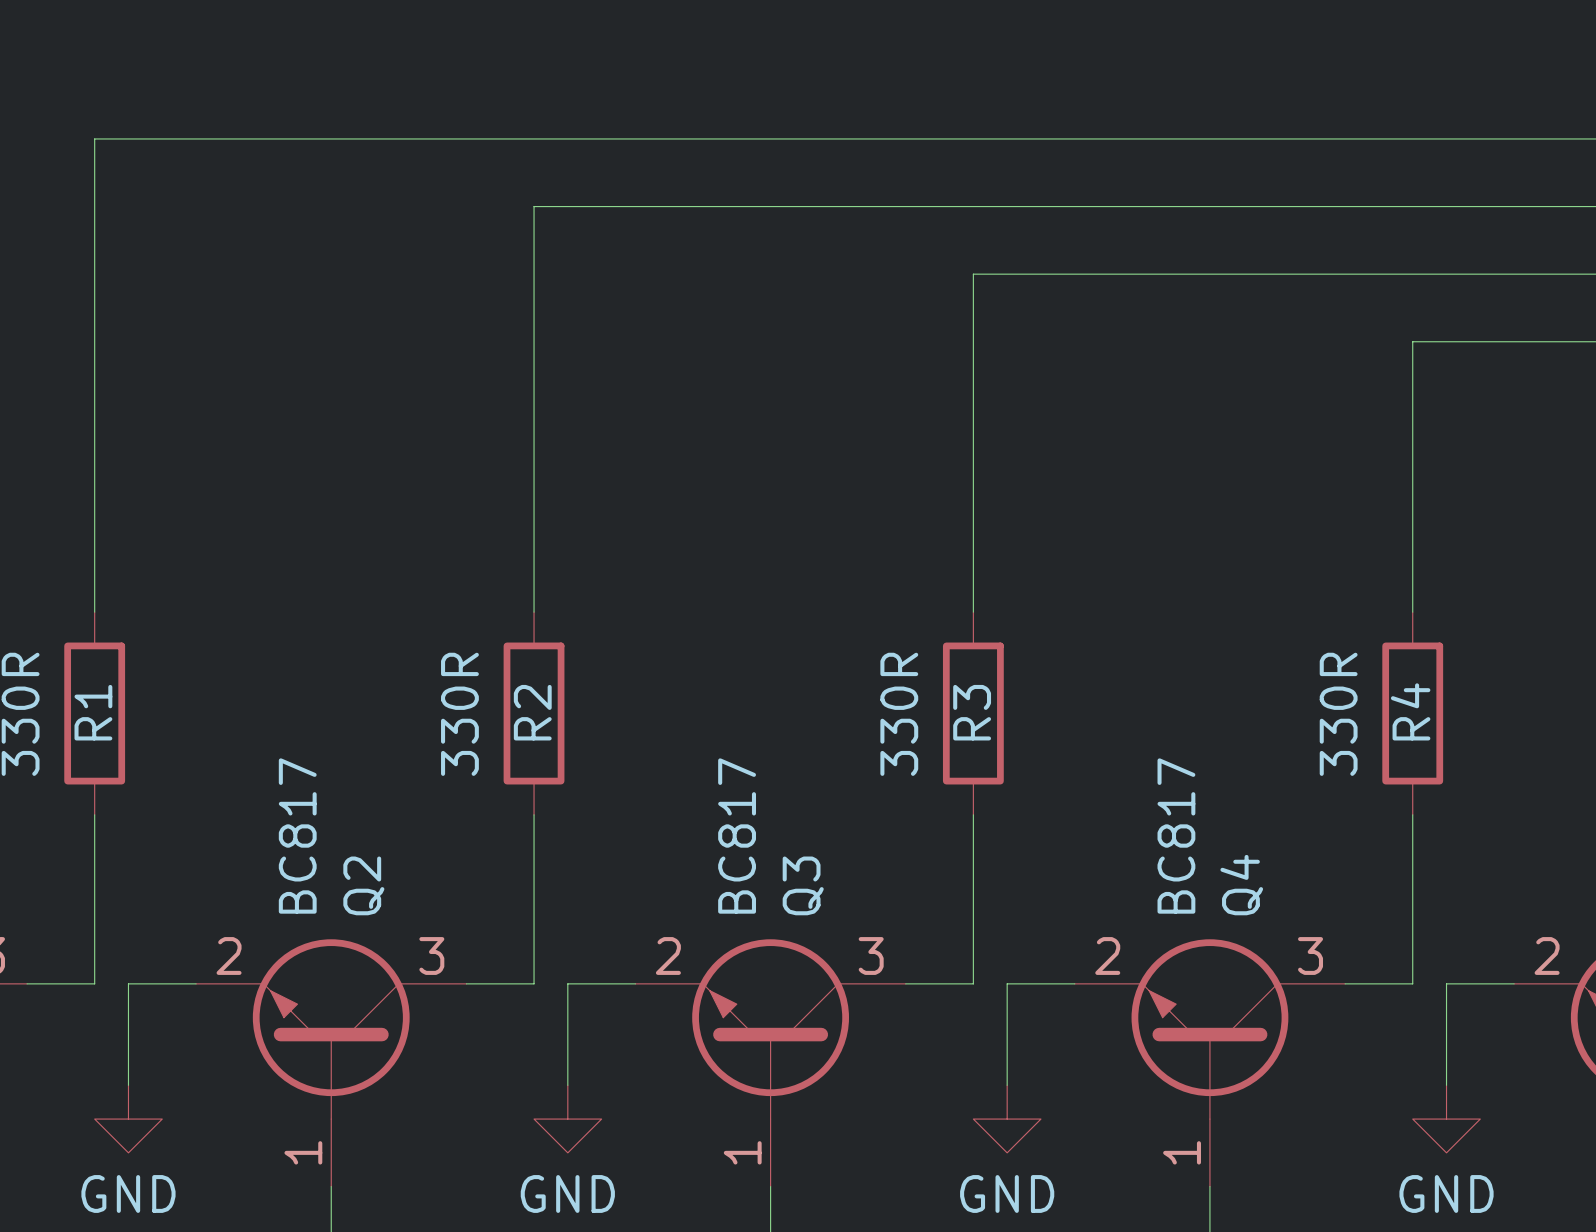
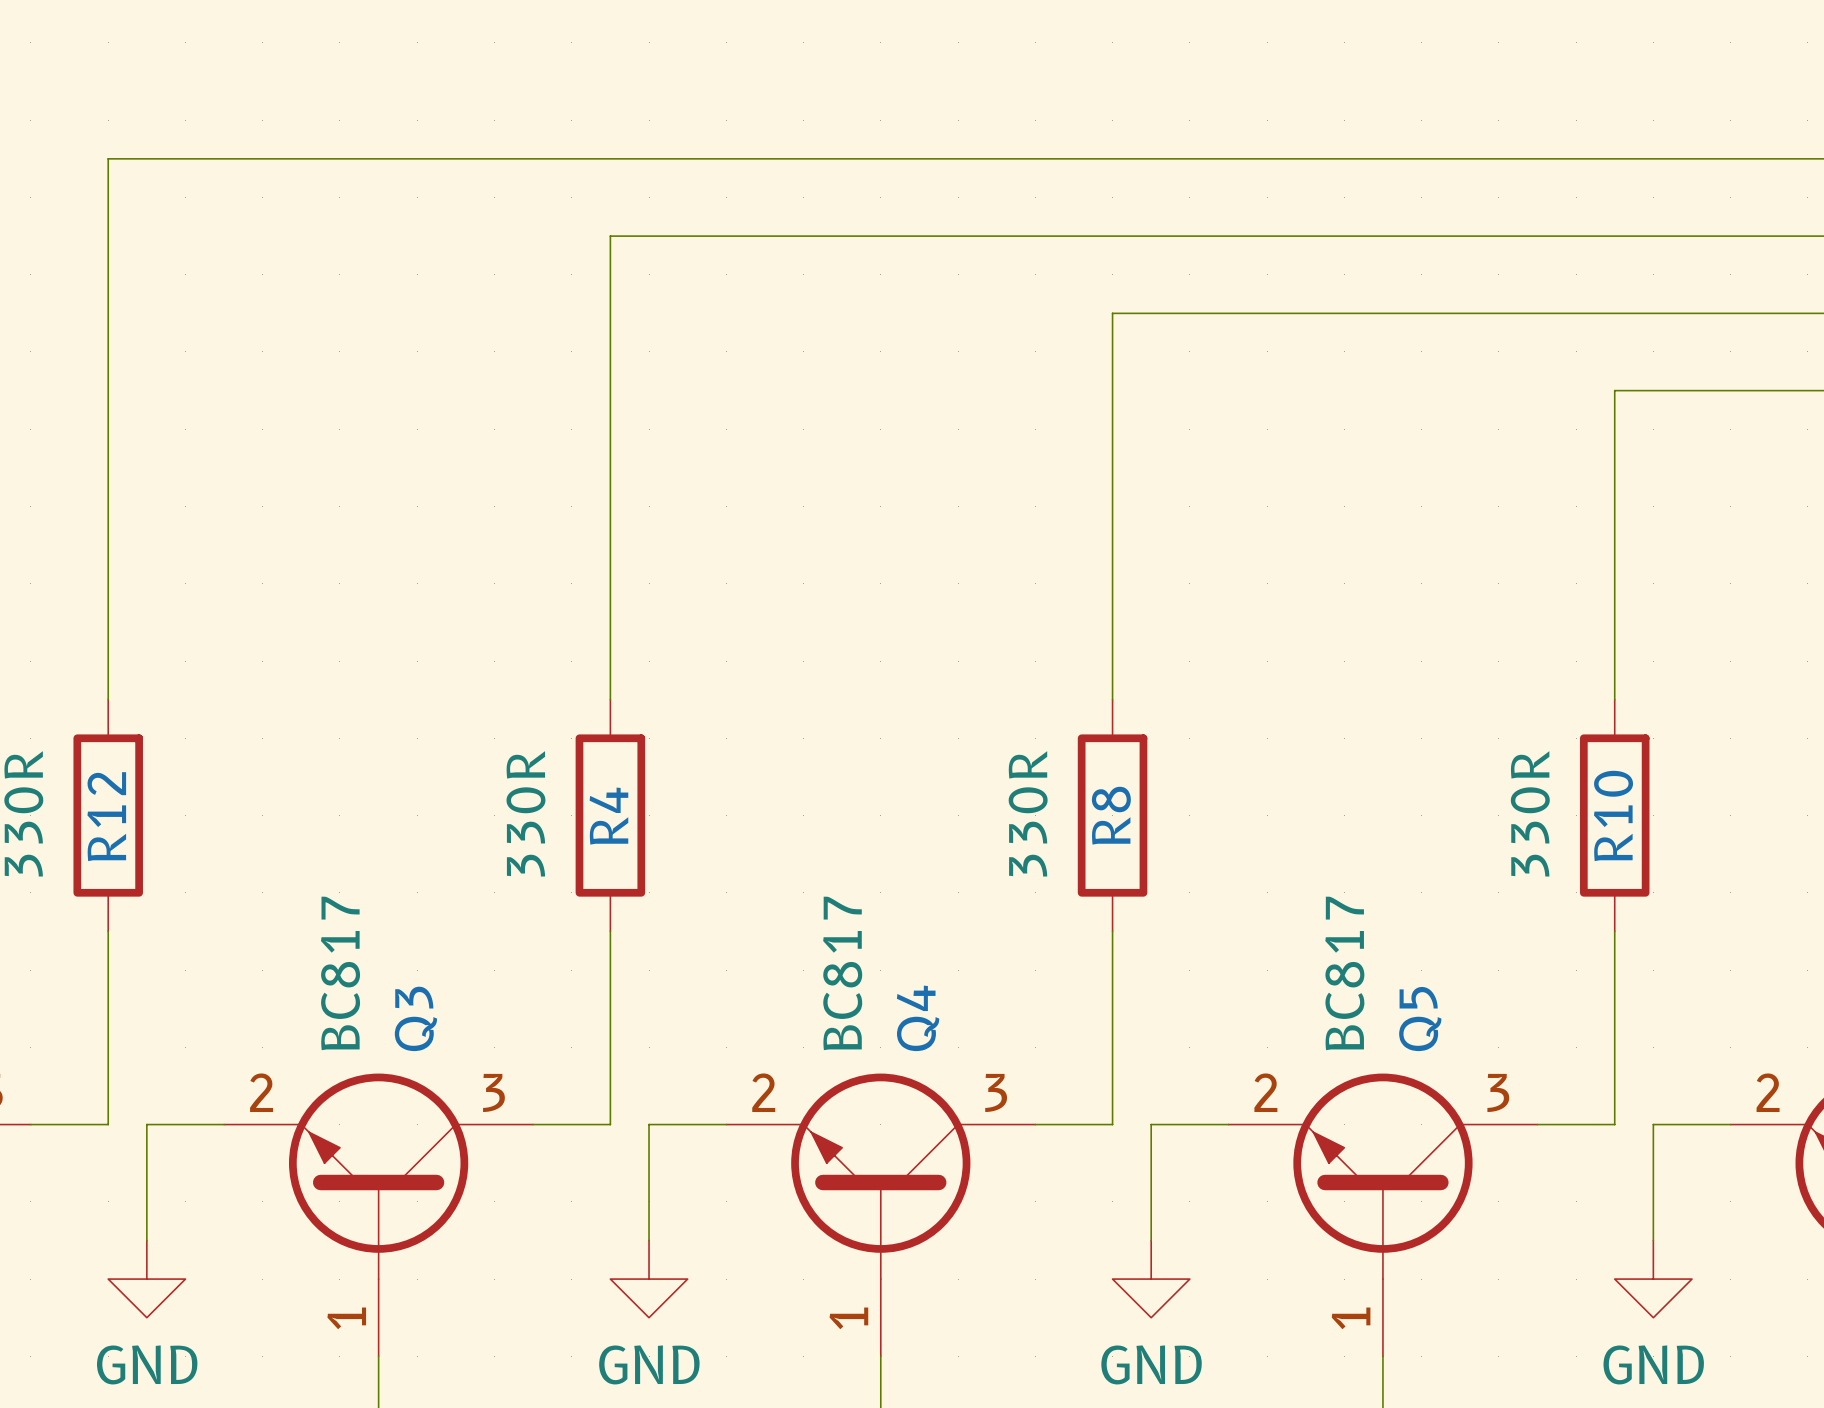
R4 name: R4 (1410, 711) -> R10 (1613, 815)
R1 name: R1 (93, 712) -> R12 (106, 816)
R2 name: R2 (532, 712) -> R4 (608, 816)
R3 name: R3 (972, 712) -> R8 (1111, 815)
Q2 name: Q2 (363, 885) -> Q3 (415, 1018)
Q3 name: Q3 (803, 885) -> Q4 (918, 1018)
Q4 name: Q4 (1241, 885) -> Q5 (1420, 1019)

